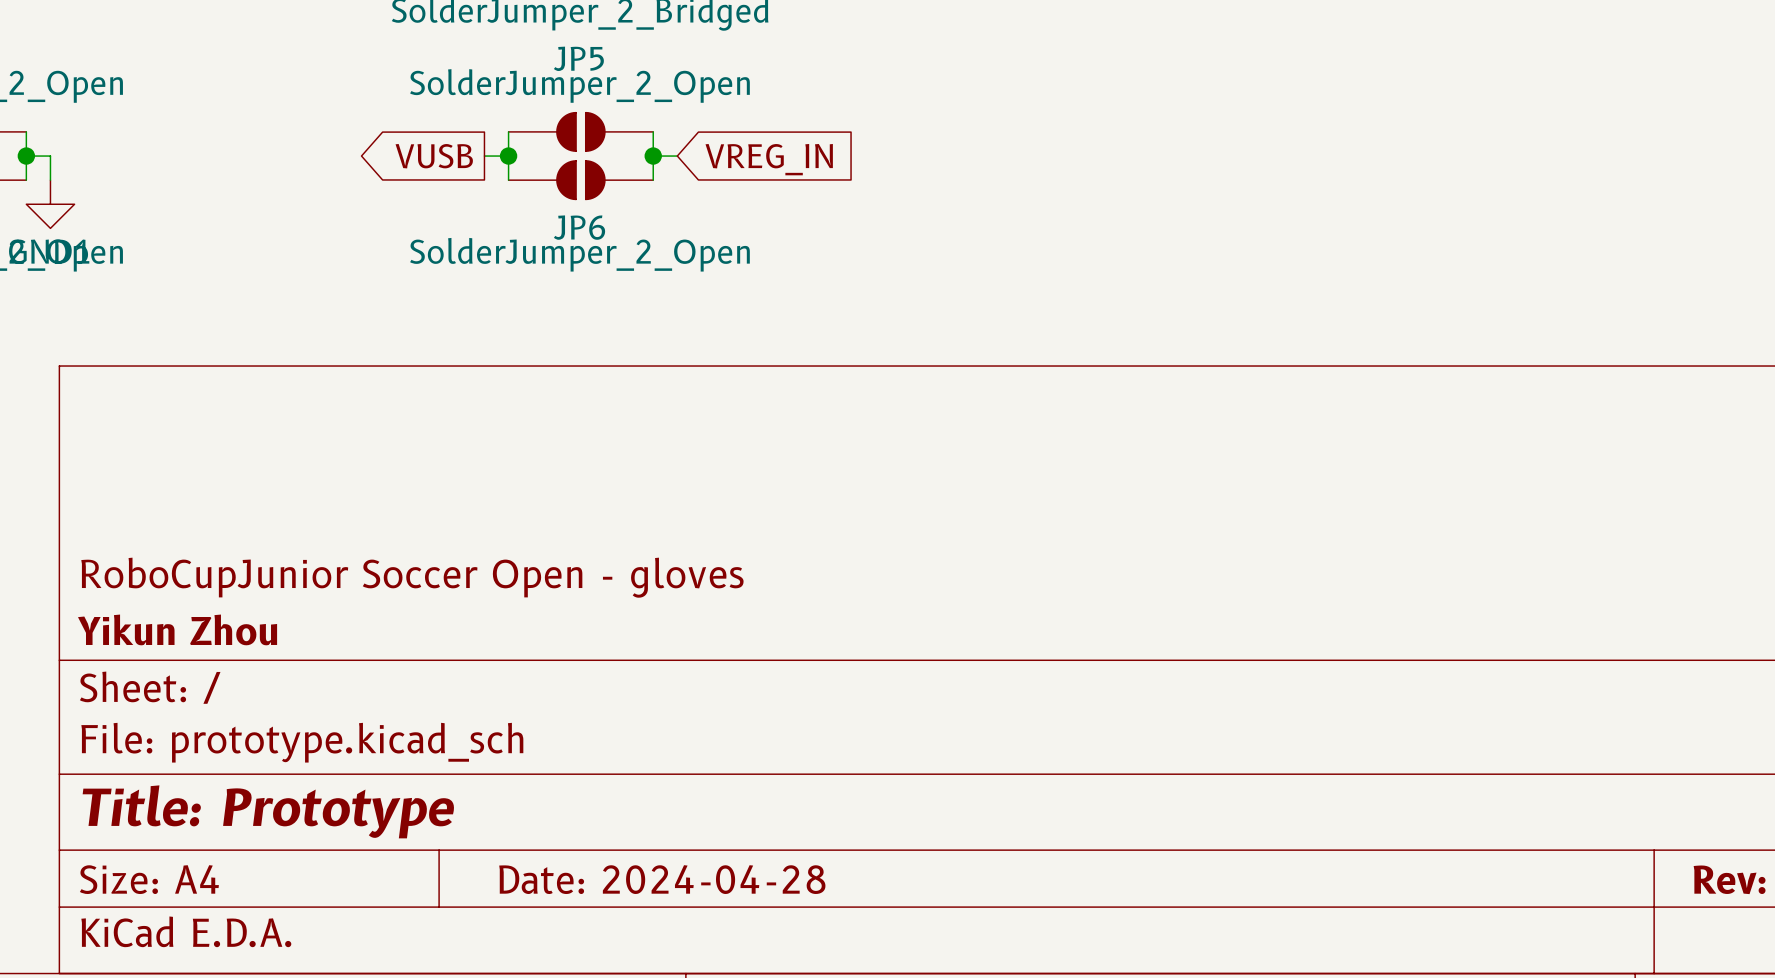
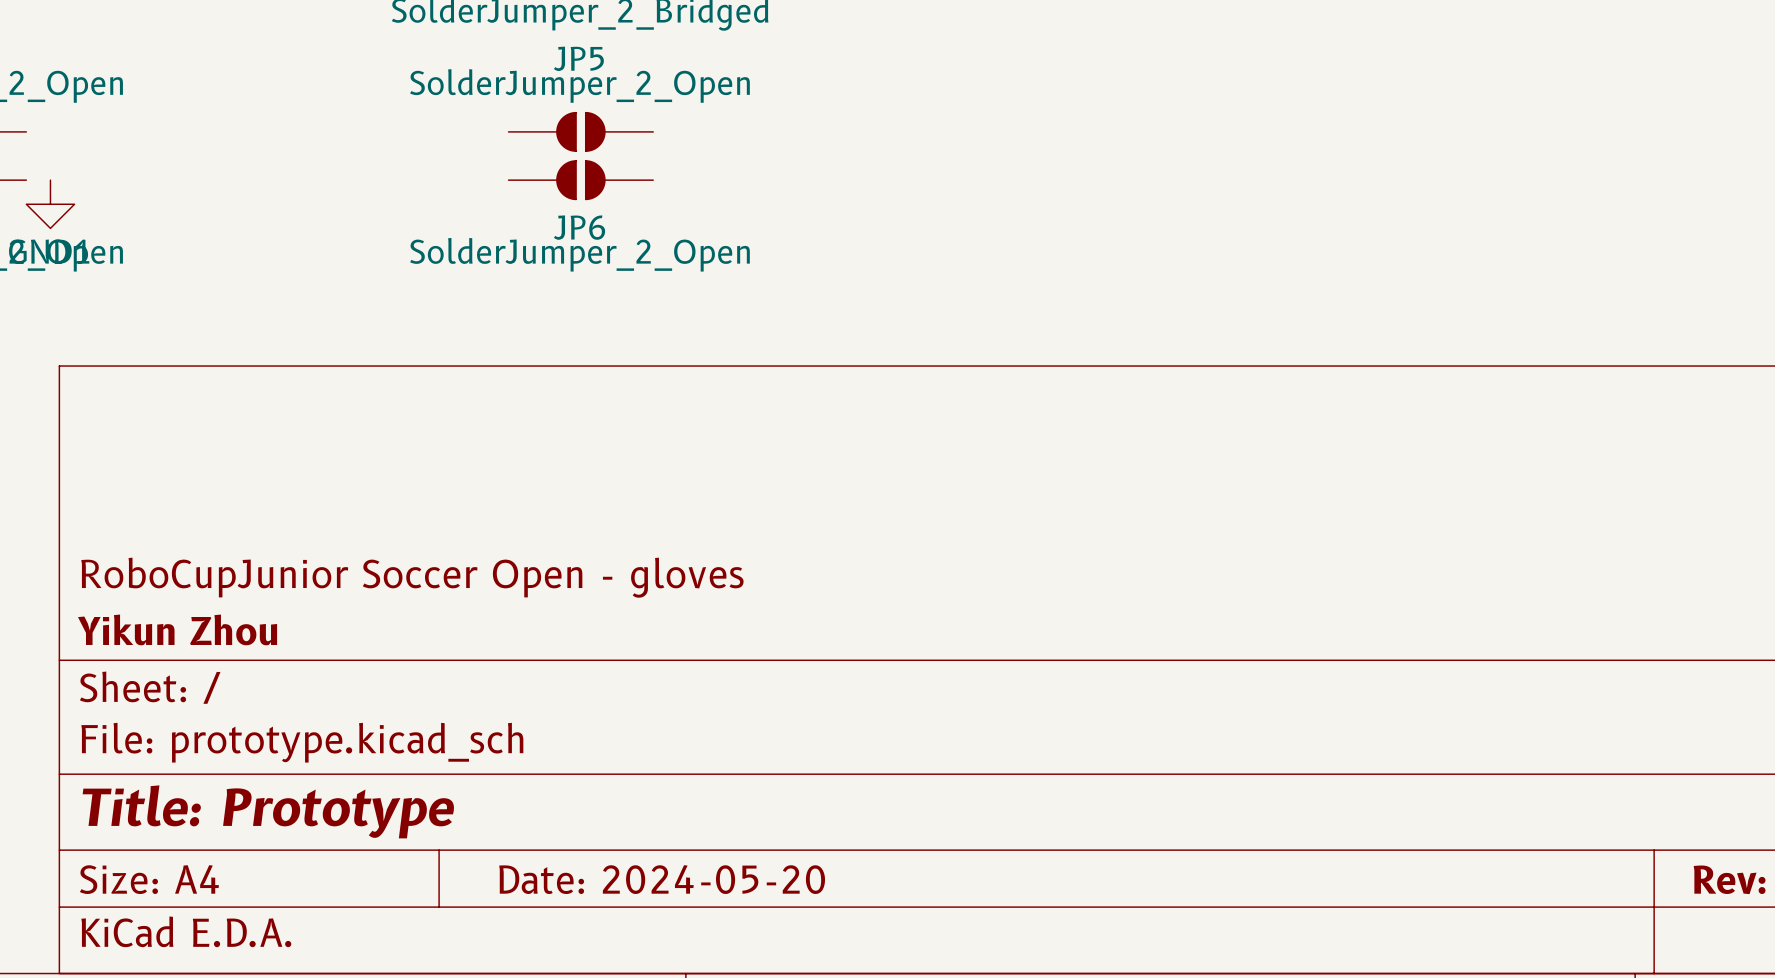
wire: (26, 131) (26, 180) -> none
wire: (508, 131) (508, 180) -> none
wire: (653, 131) (653, 180) -> none
wire: (26, 156) (50, 156) (50, 180) -> none
junction: (26, 156) -> none
global label: VUSB (434, 156) -> none
wire: (484, 156) (508, 156) -> none
junction: (508, 156) -> none
wire: (653, 156) (677, 156) -> none
junction: (653, 156) -> none
global label: VREG_IN (769, 159) -> none
title block: Date: 2024-04-28 (662, 879) -> Date: 2024-05-20 (662, 879)

